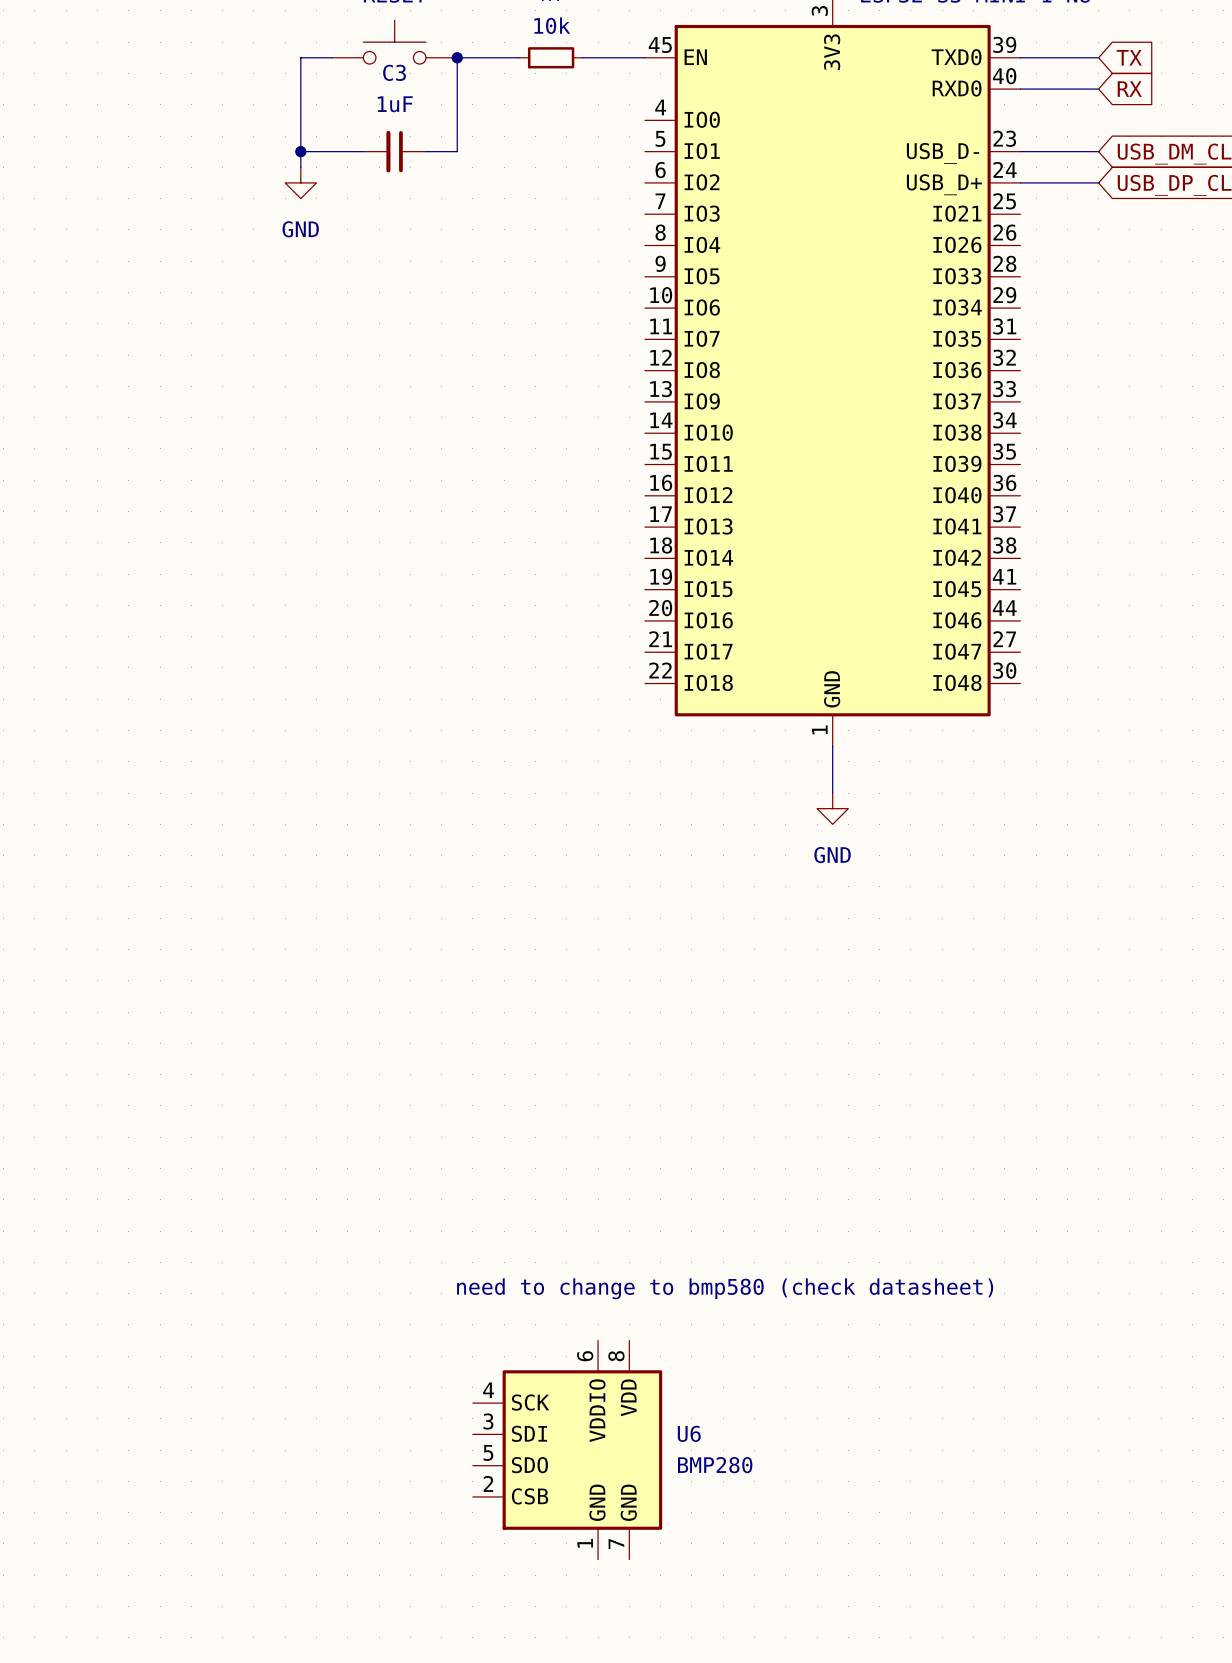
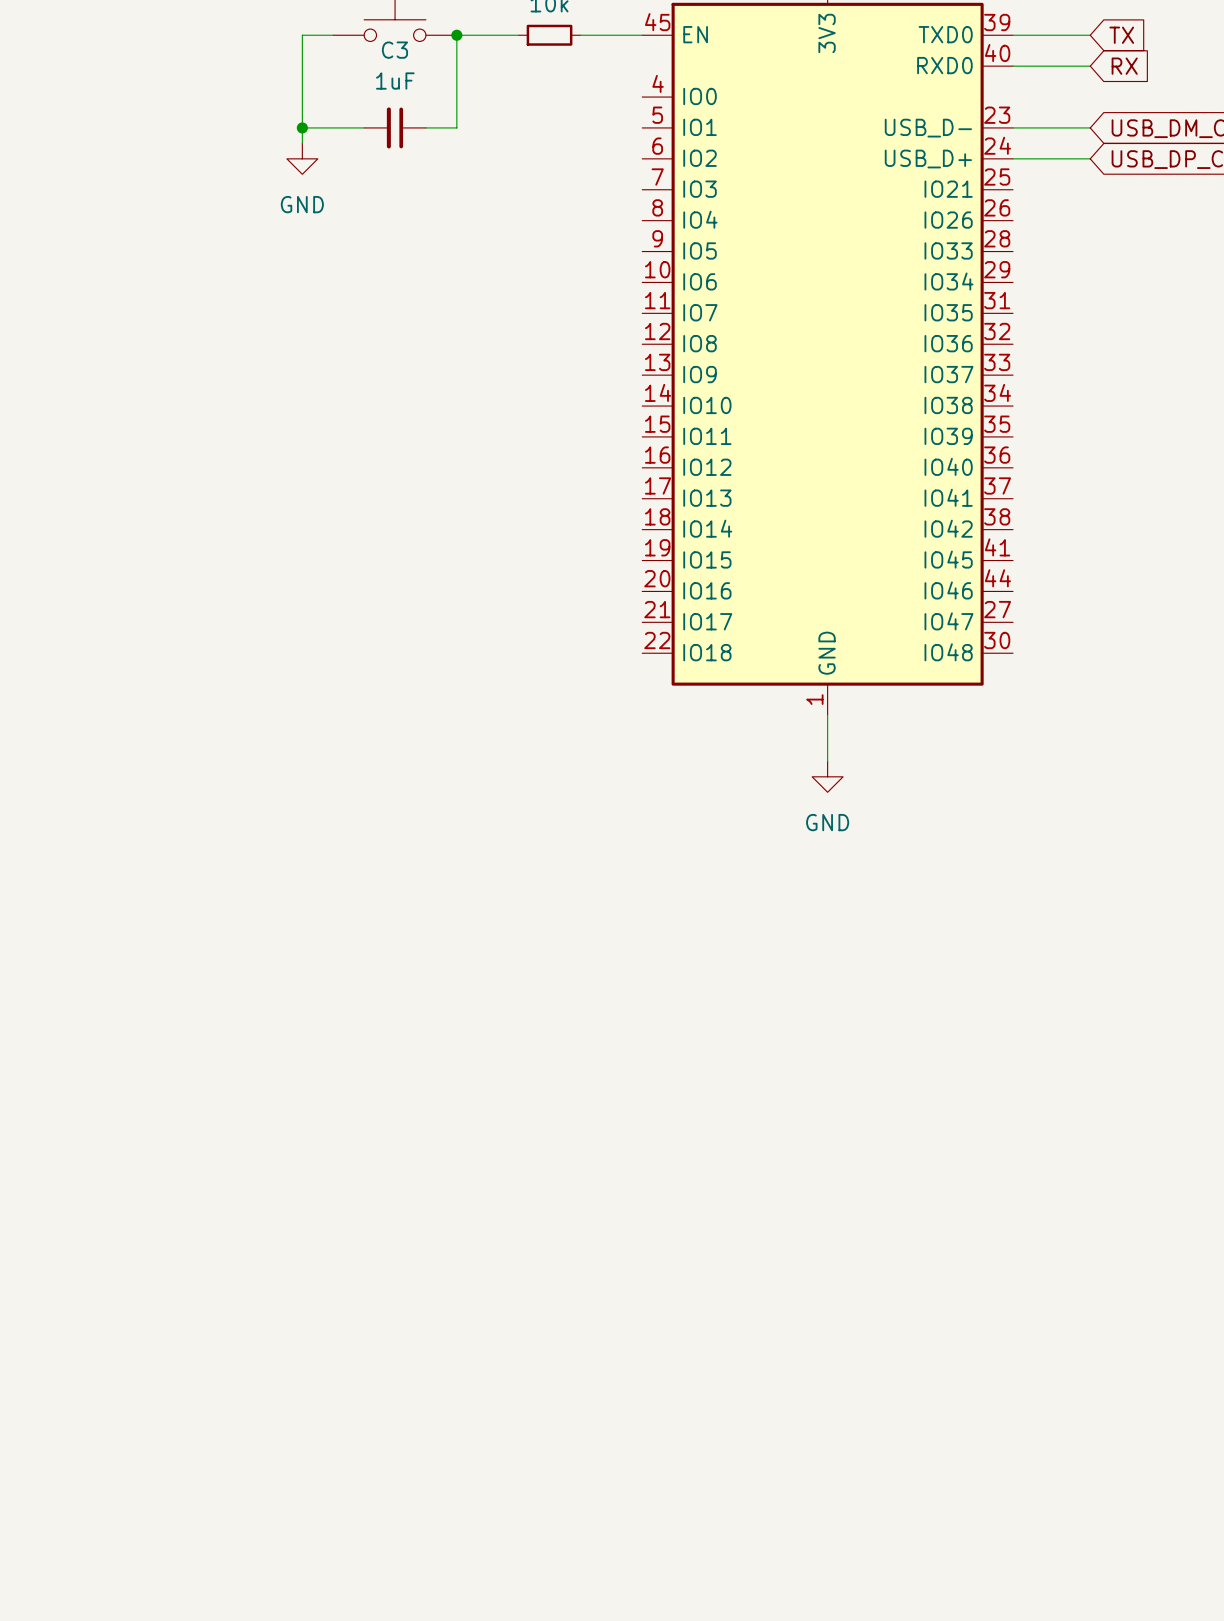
text: need to change to bmp580 (check datasheet) (725, 1288) -> none
U6: BMP280 (567, 1450) -> none

